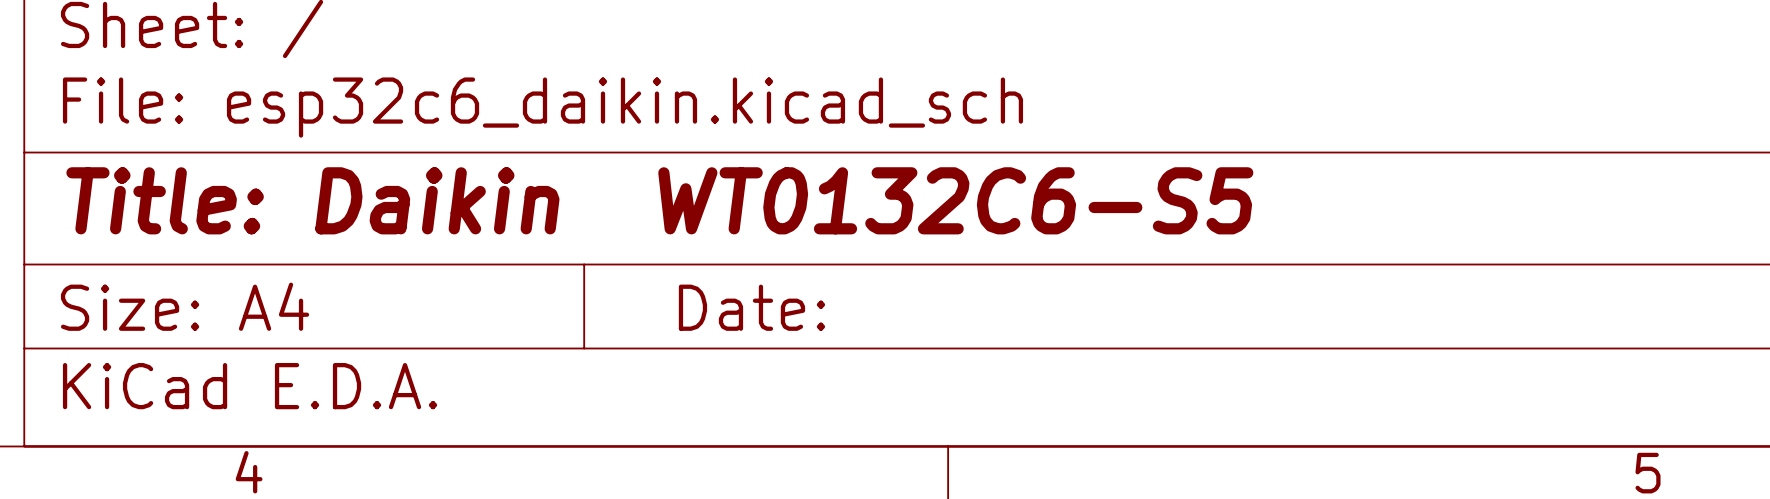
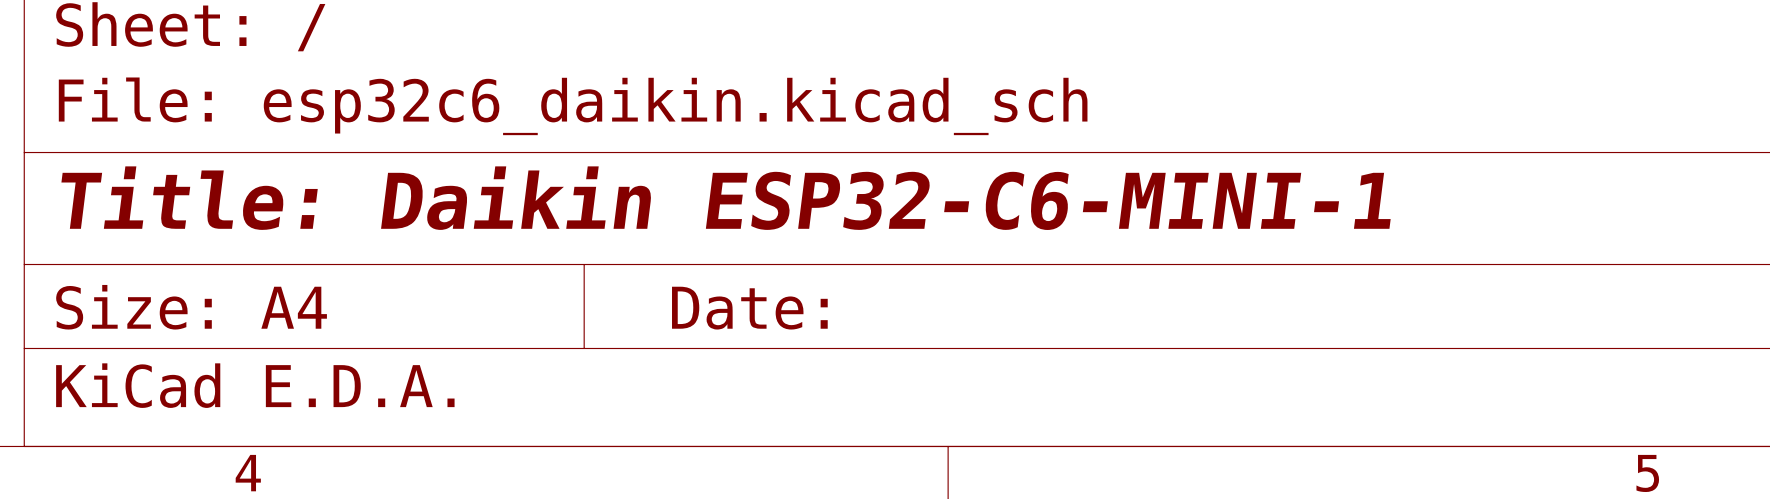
title block: Title: Daikin WT0132C6-S5 (659, 200) -> Title: Daikin ESP32-C6-MINI-1 (726, 198)

